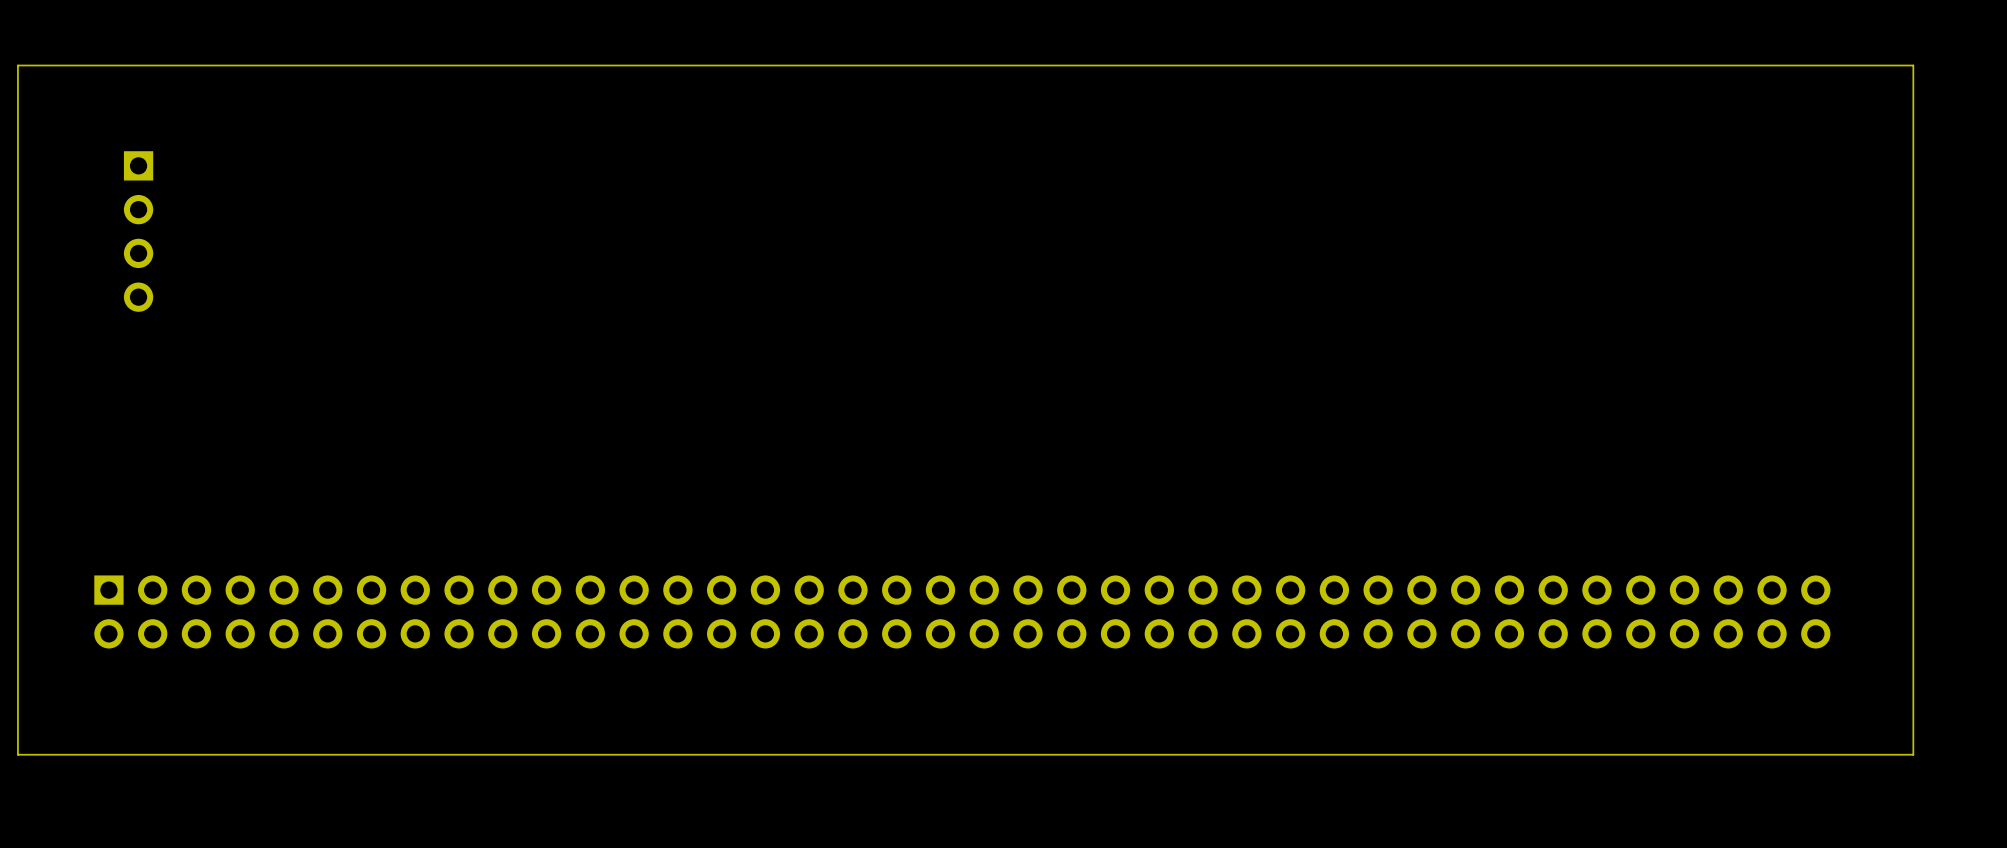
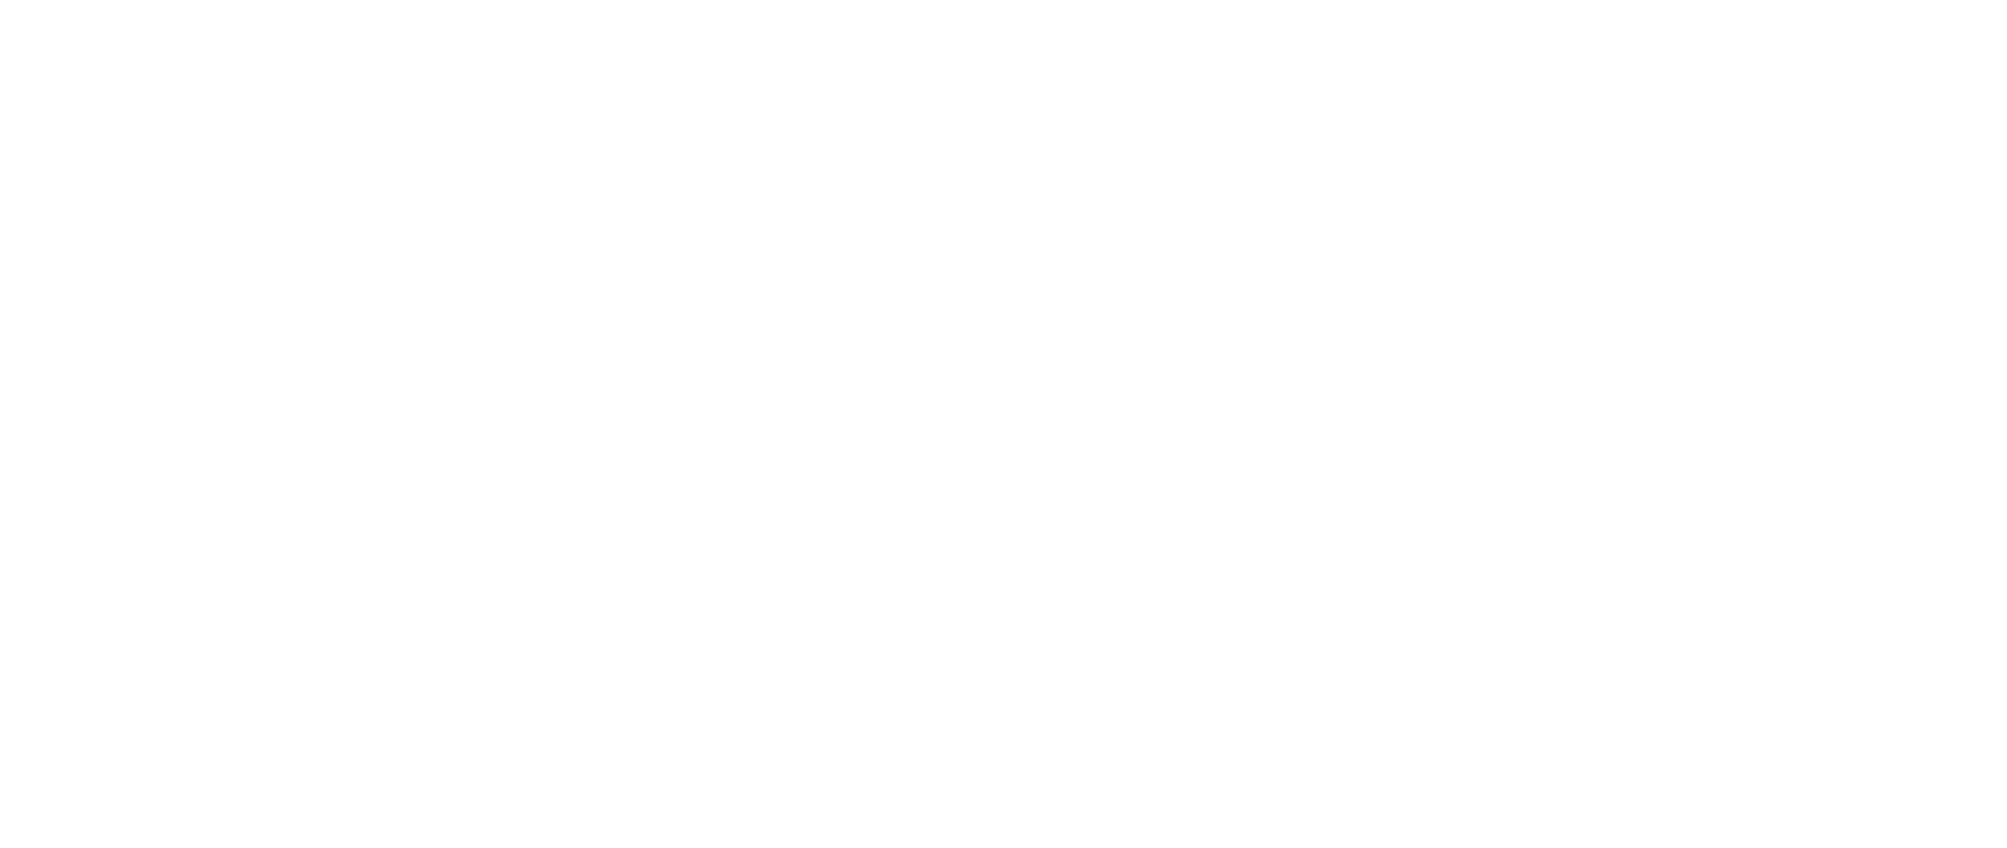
board edge: (1913, 65) (17, 65) (17, 754) (1913, 754) (1913, 65) -> none
part: (138, 231) -> none
part: (962, 611) -> none

